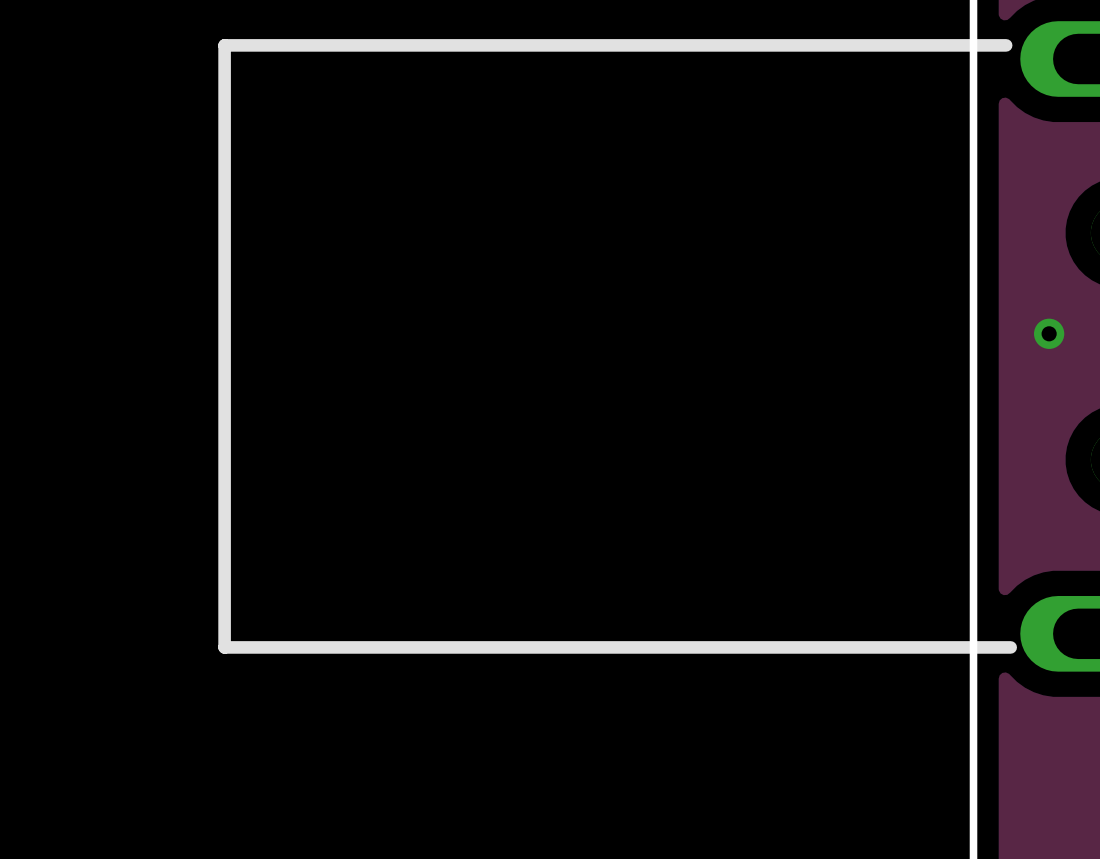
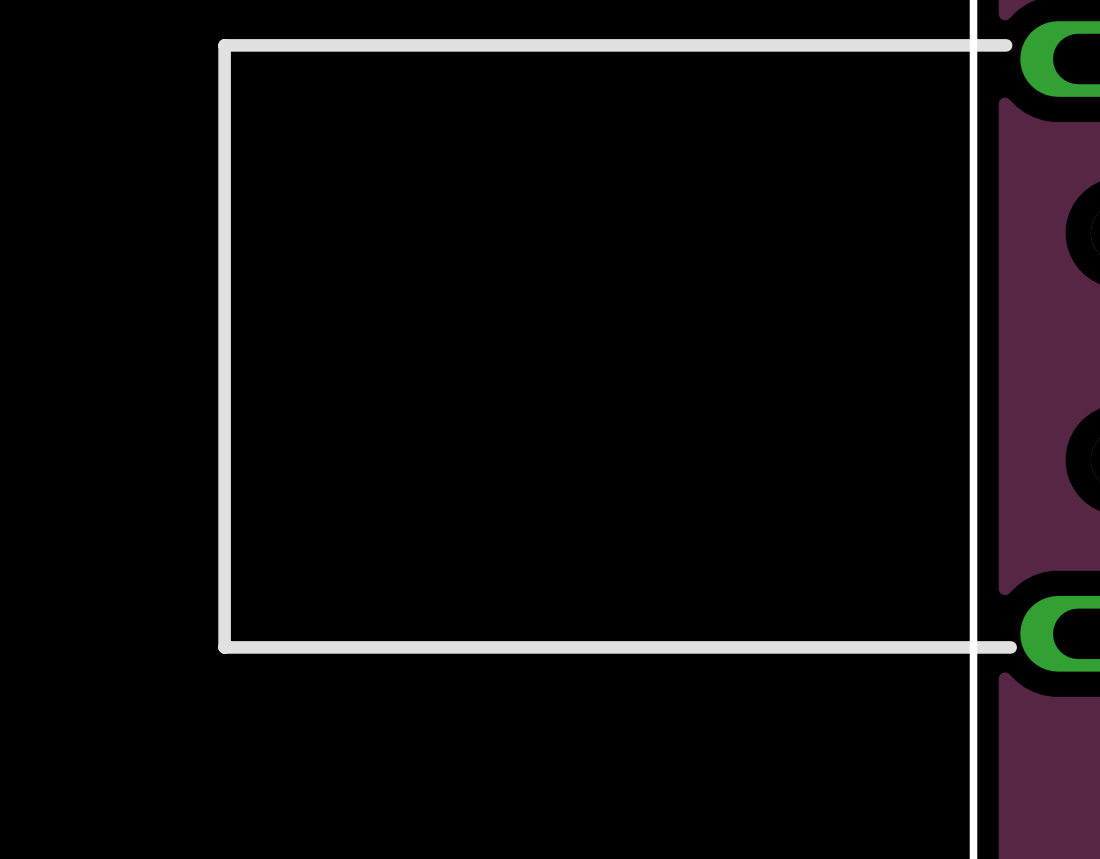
via: (1049, 333) -> none

